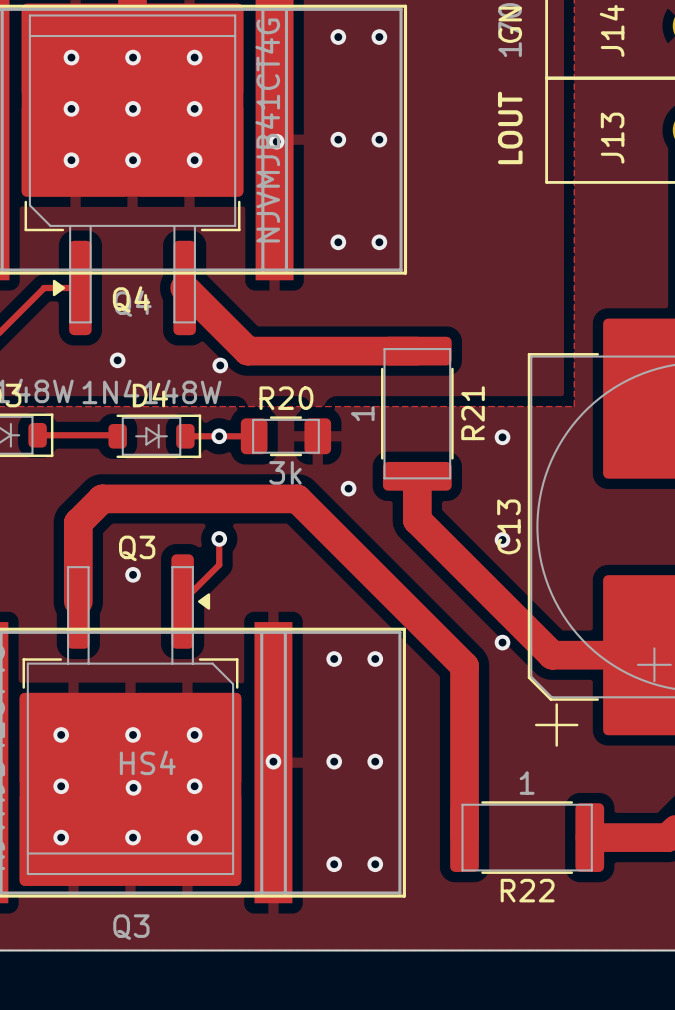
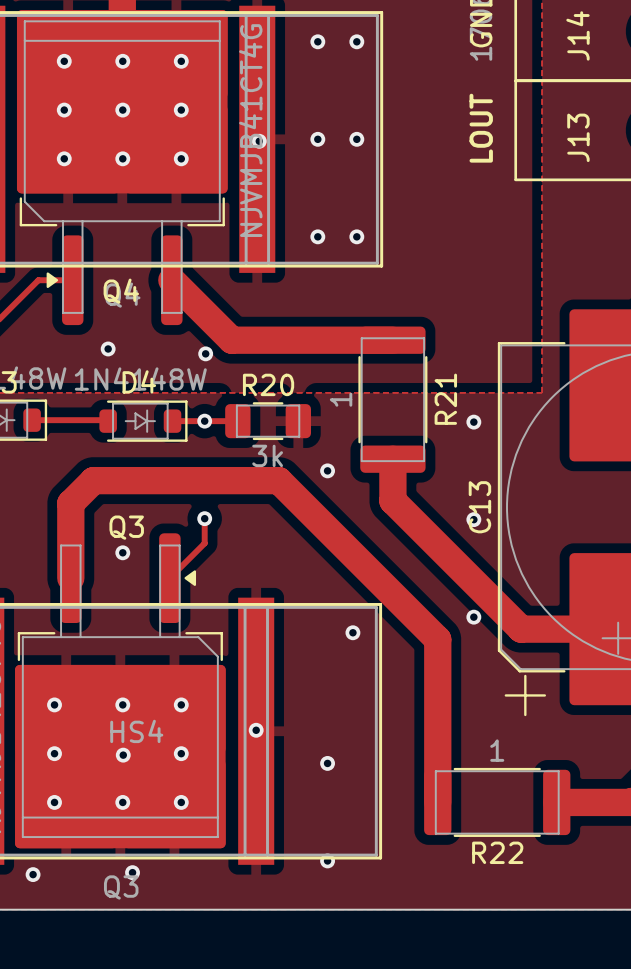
via: (334, 659) -> none
via: (334, 761) -> none
via: (375, 761) -> none
via: none -> (327, 763)
via: (334, 864) -> none
via: (375, 864) -> none
via: none -> (327, 860)
via: none -> (132, 872)
via: none -> (33, 874)

